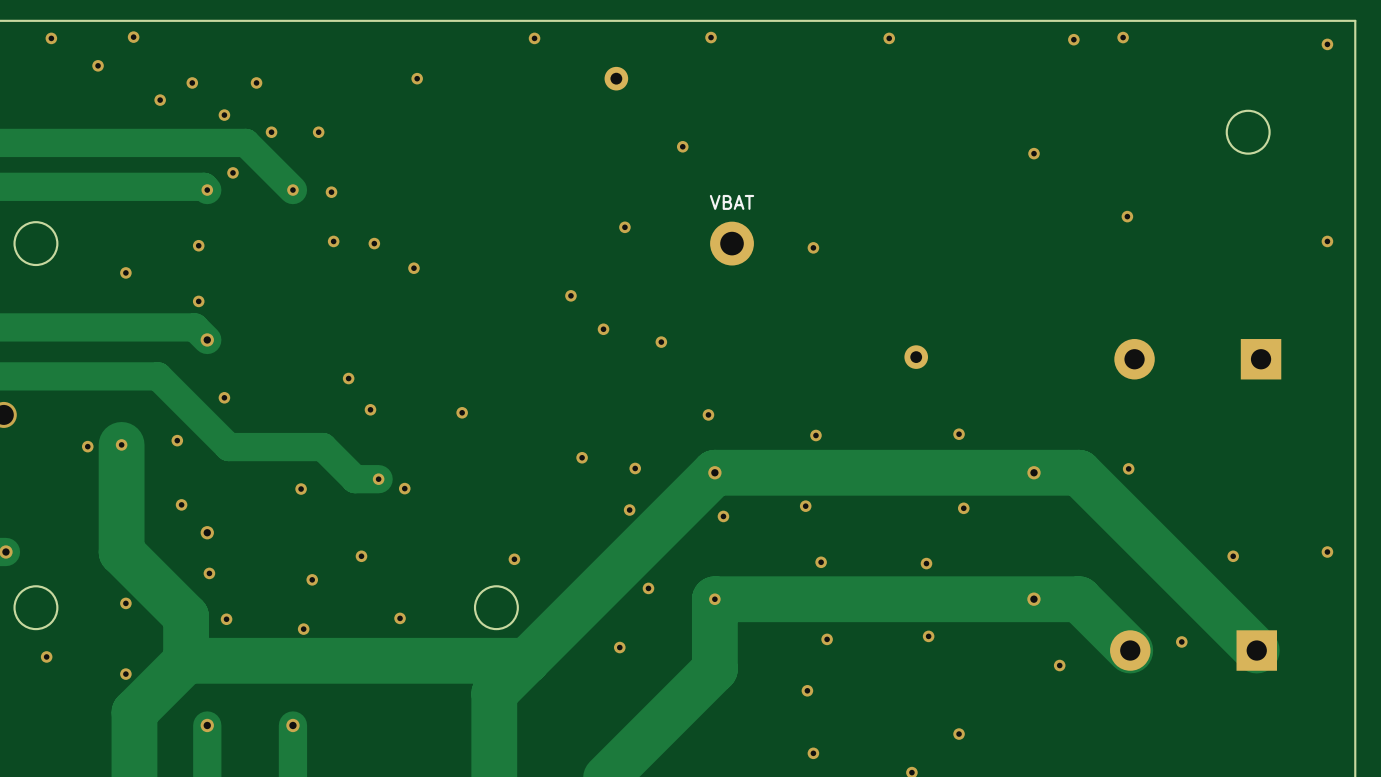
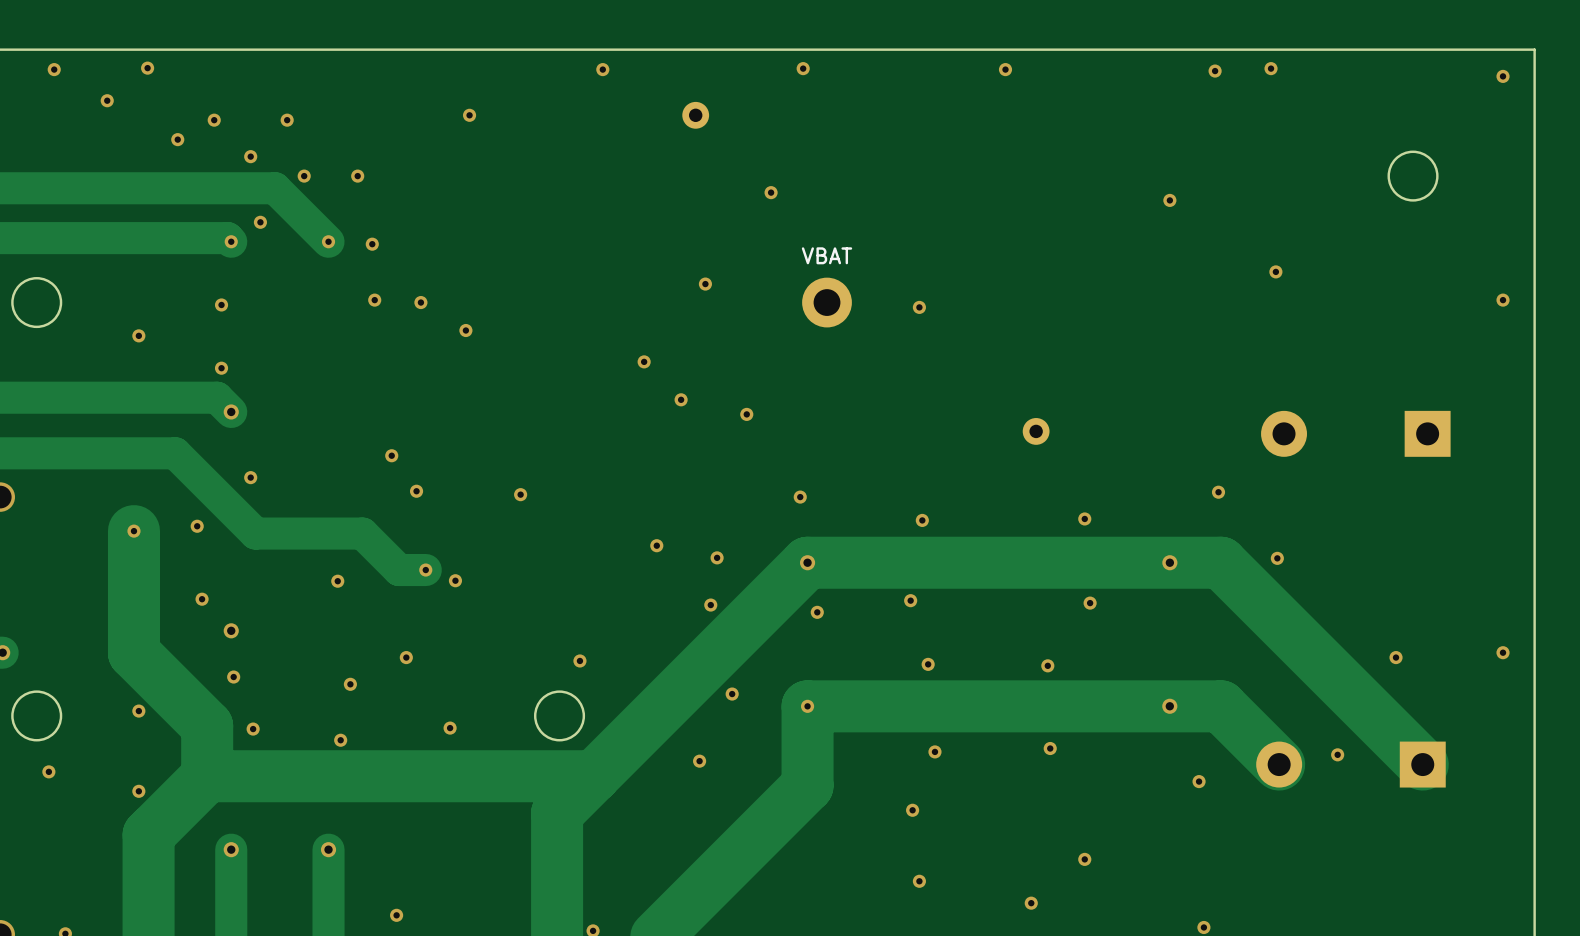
via: none -> (1218, 492)
via: (87, 446) -> none

